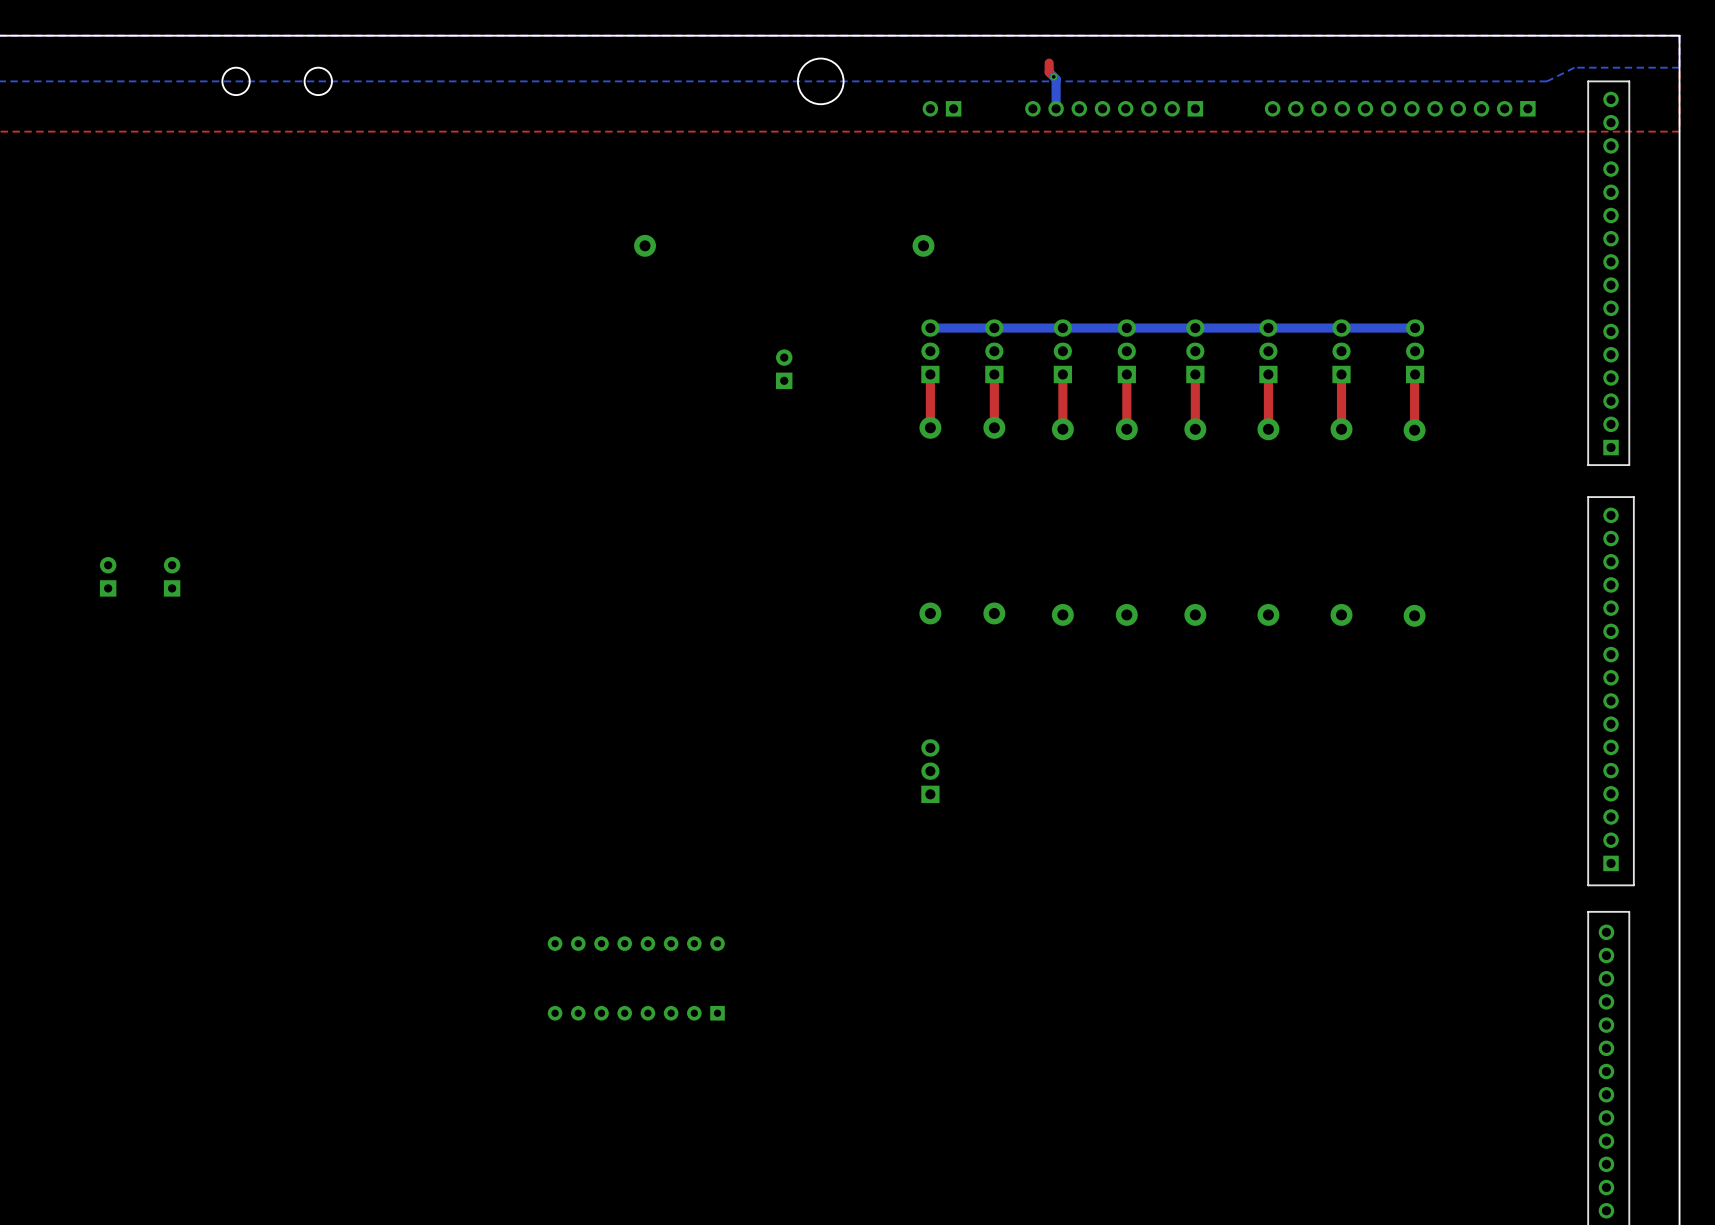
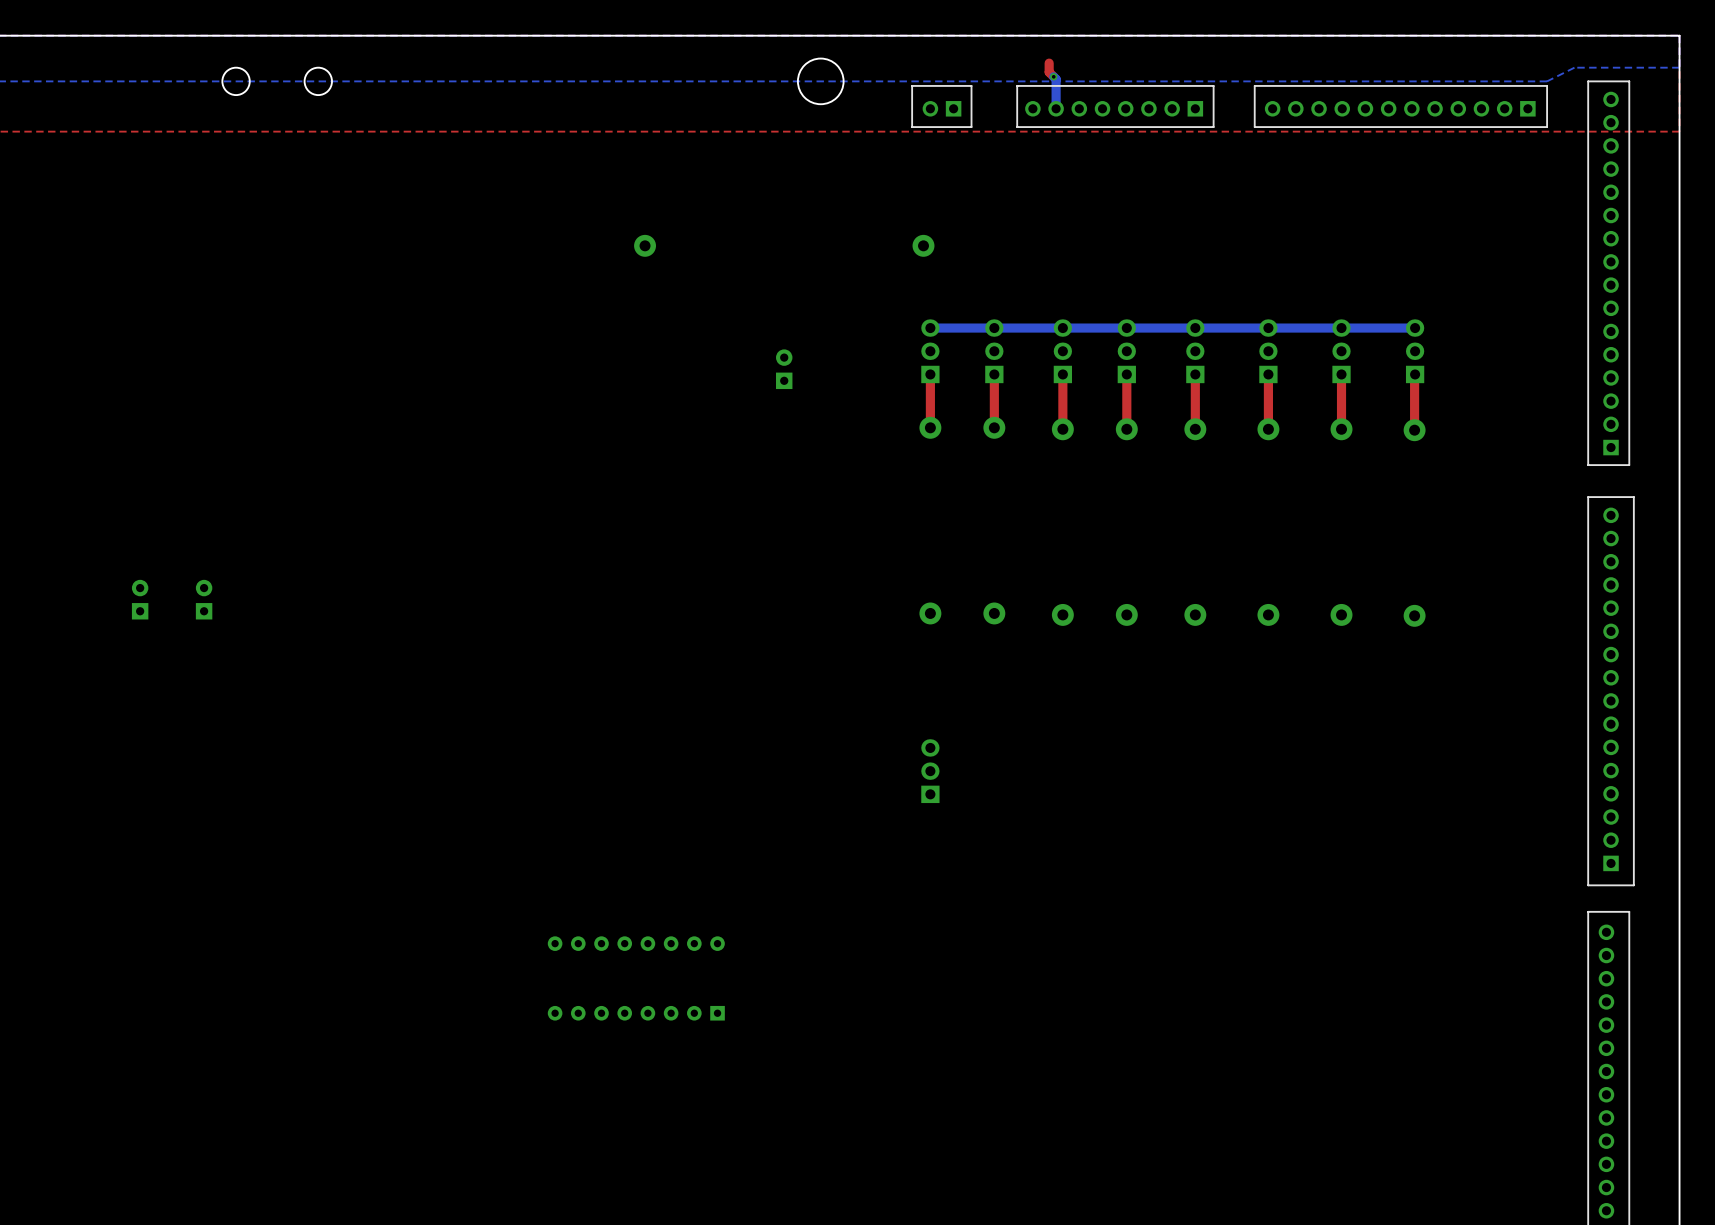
line: none -> (971, 85) (912, 85) (912, 127) (971, 127) (971, 85)
line: none -> (1213, 85) (1017, 85) (1017, 127) (1213, 127) (1213, 85)
line: none -> (1547, 85) (1254, 85) (1254, 127) (1547, 127) (1547, 85)
part: (108, 576) -> none
part: (172, 576) -> none
part: none -> (140, 599)
part: none -> (204, 599)

